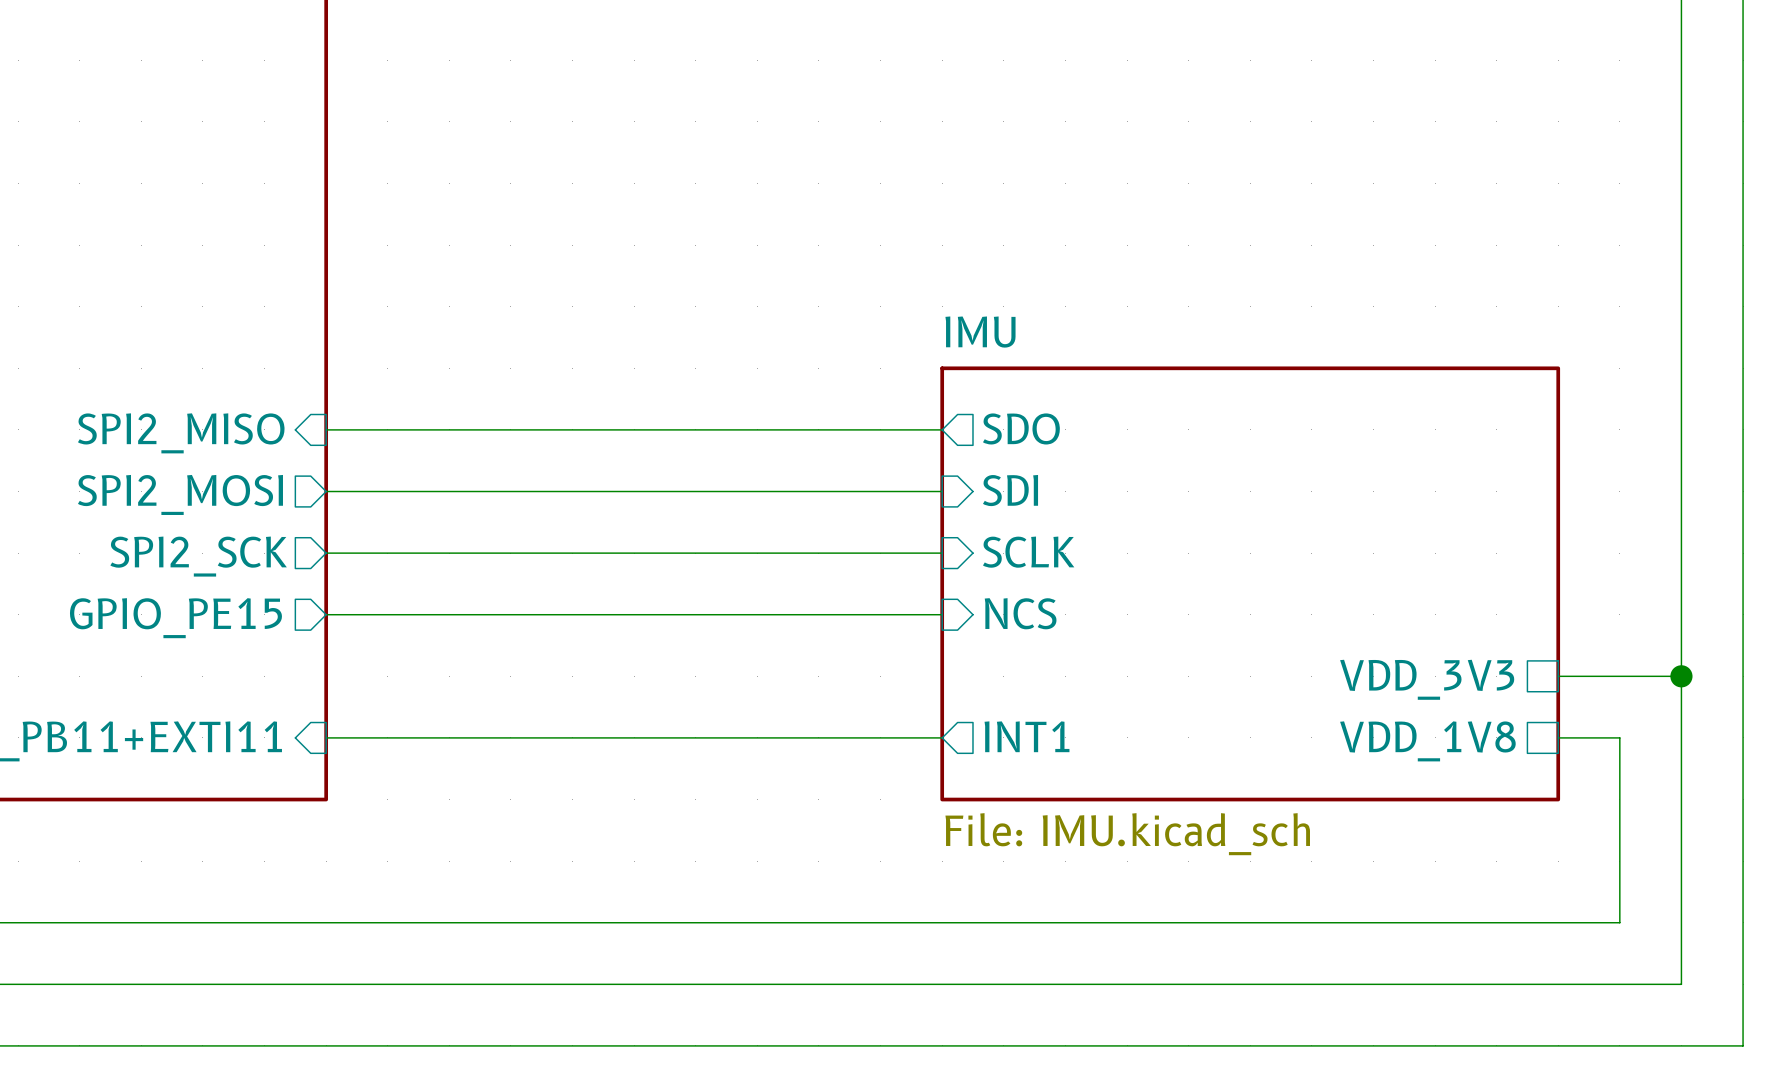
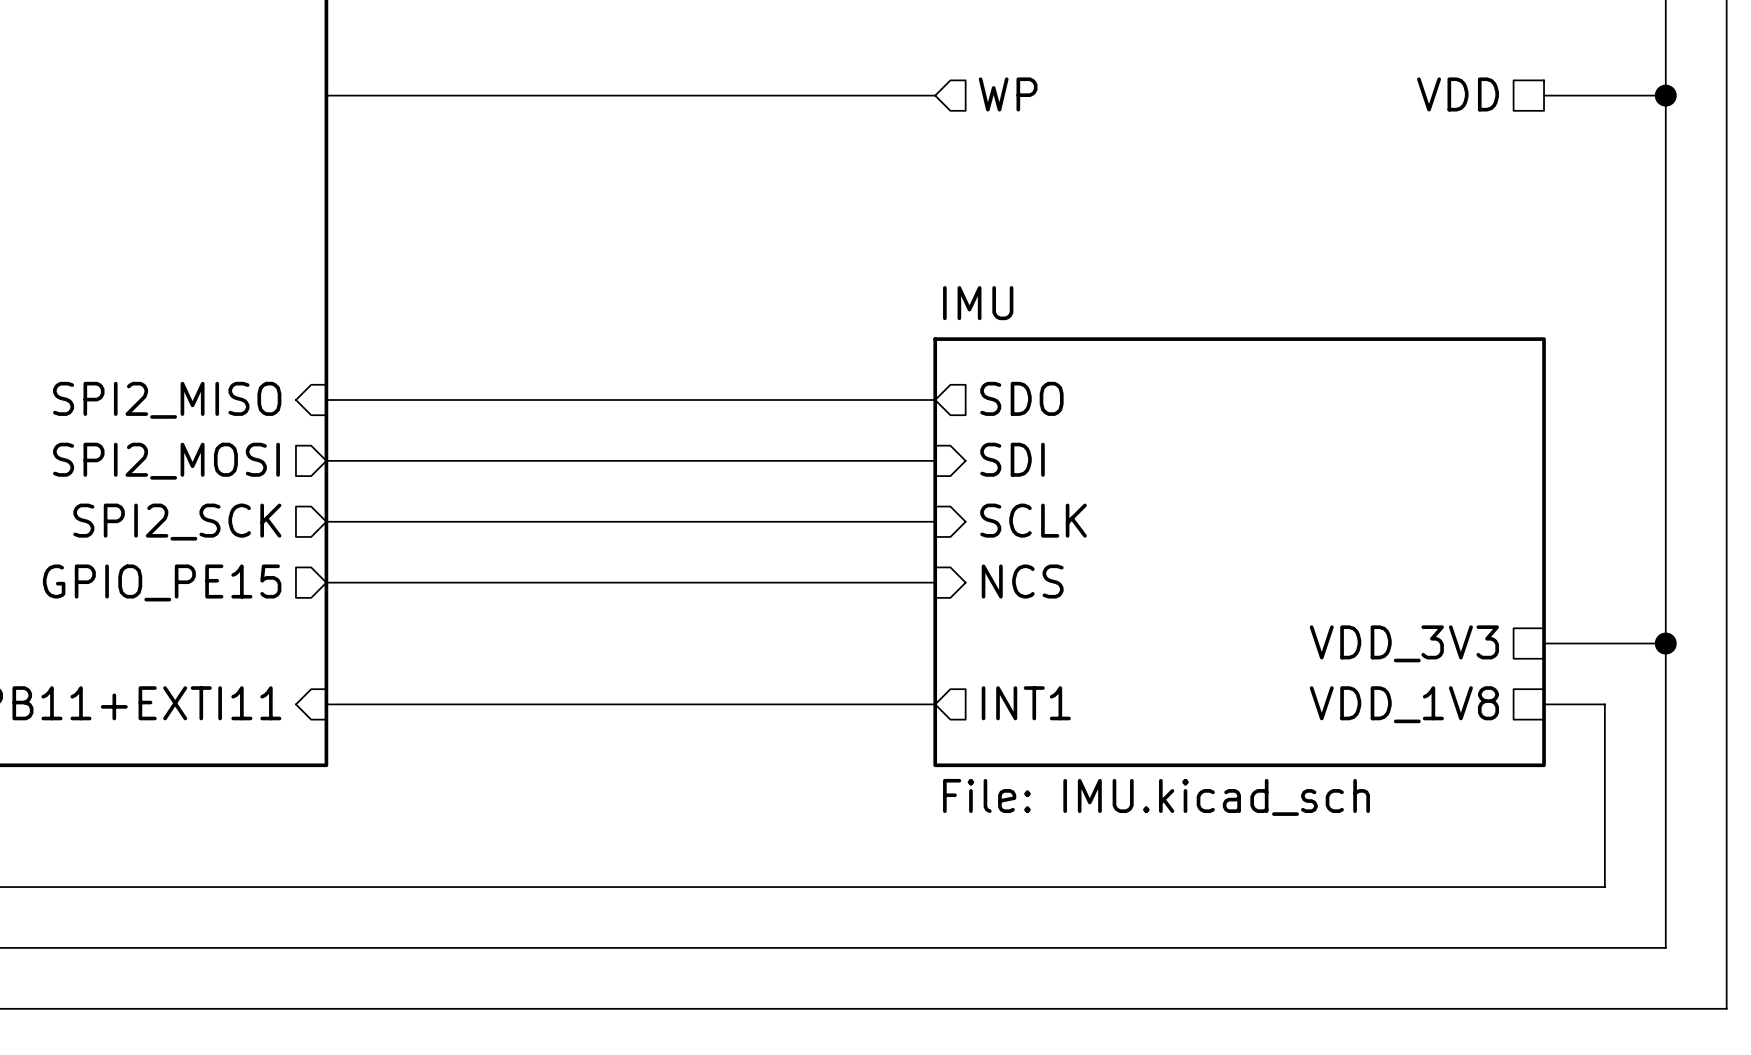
sheet pin: none -> WP (1008, 94)
sheet pin: none -> VDD (1458, 94)
wire: none -> (326, 95) (935, 95)
wire: none -> (1544, 95) (1665, 95)
junction: none -> (1665, 95)

